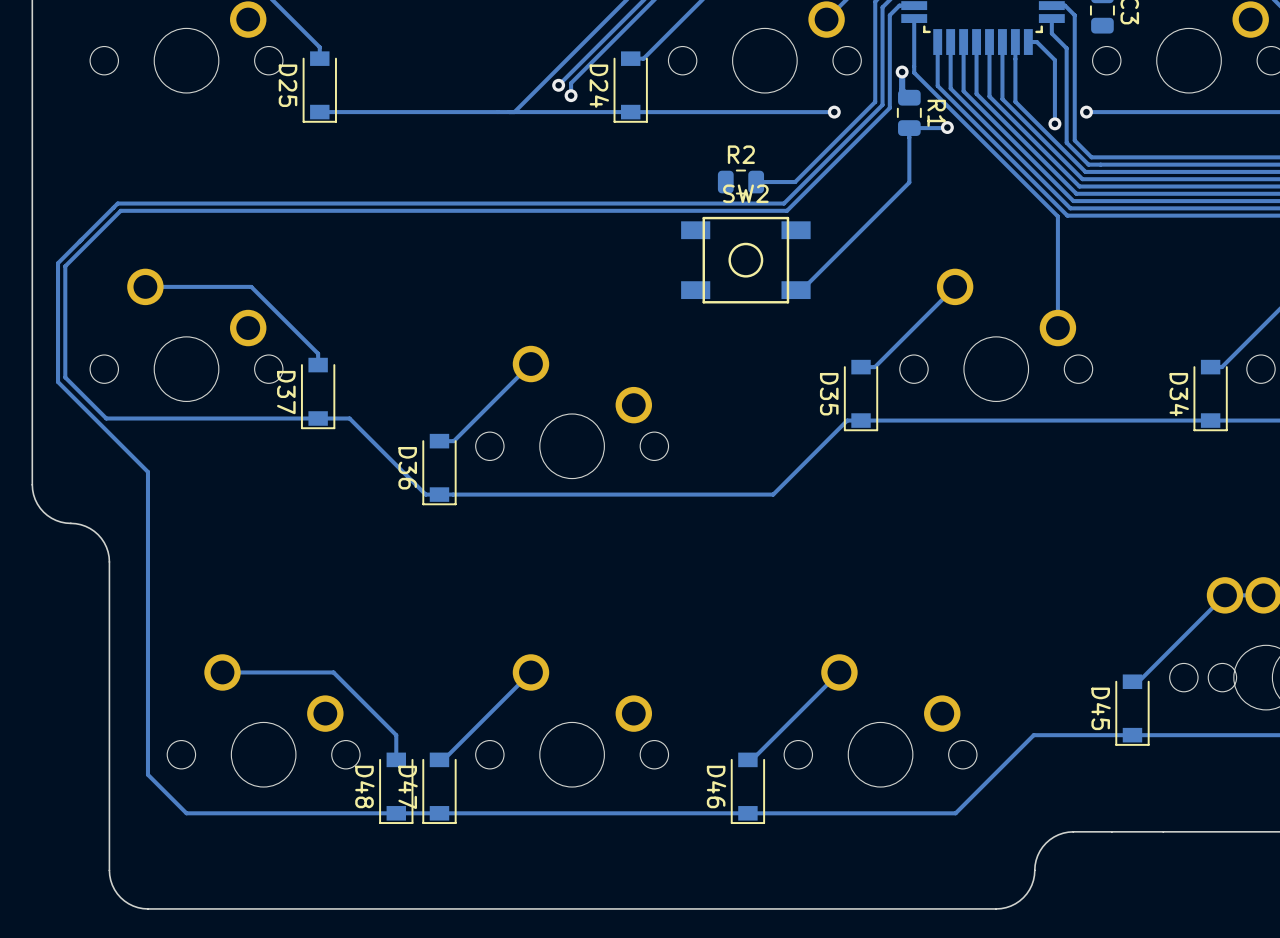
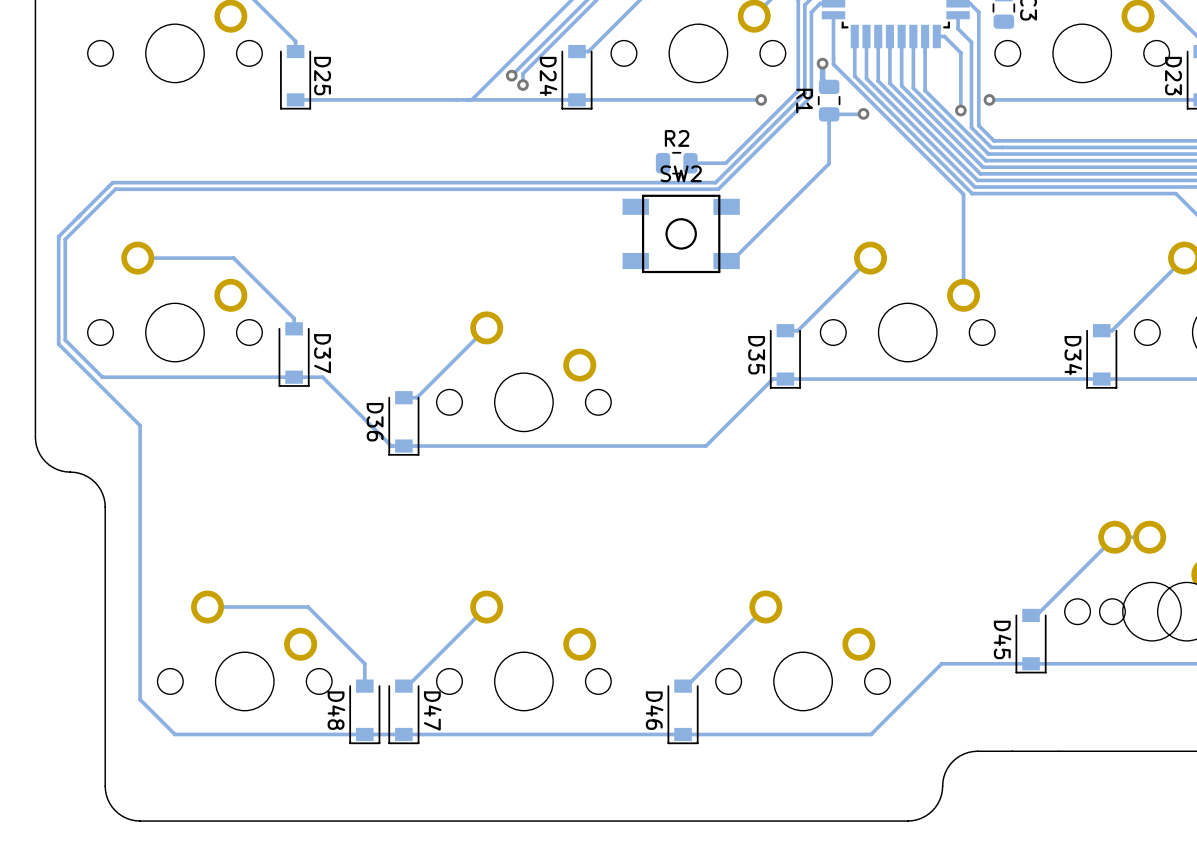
D25 name position: D25 (288, 85) -> D25 (322, 76)
R1 name position: R1 (936, 113) -> R1 (804, 100)
D37 name position: D37 (286, 392) -> D37 (322, 353)
D47 name position: D47 (408, 787) -> D47 (432, 711)

